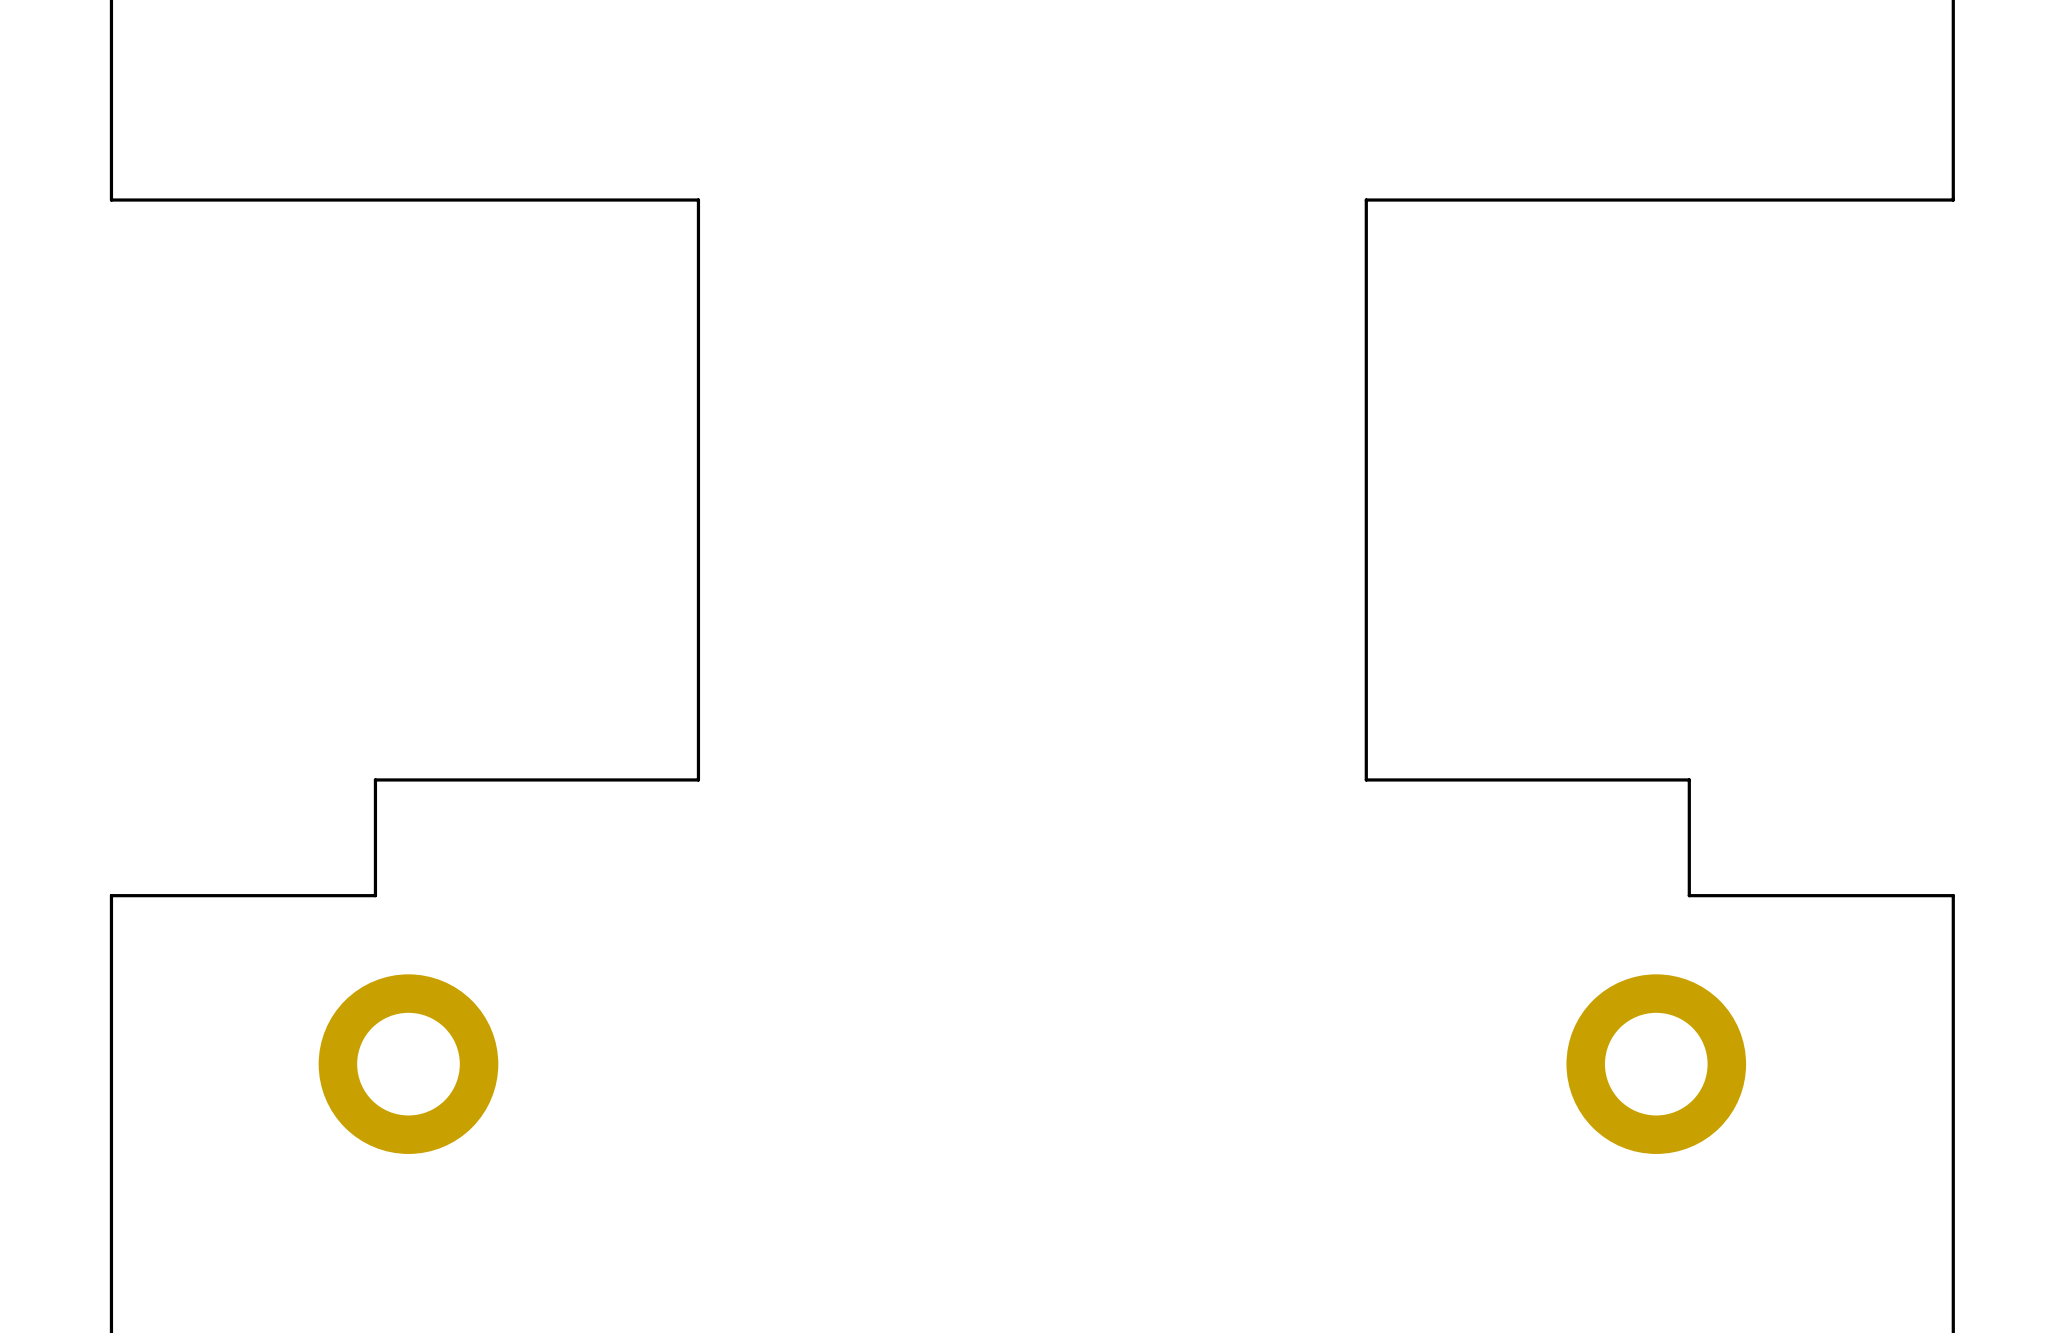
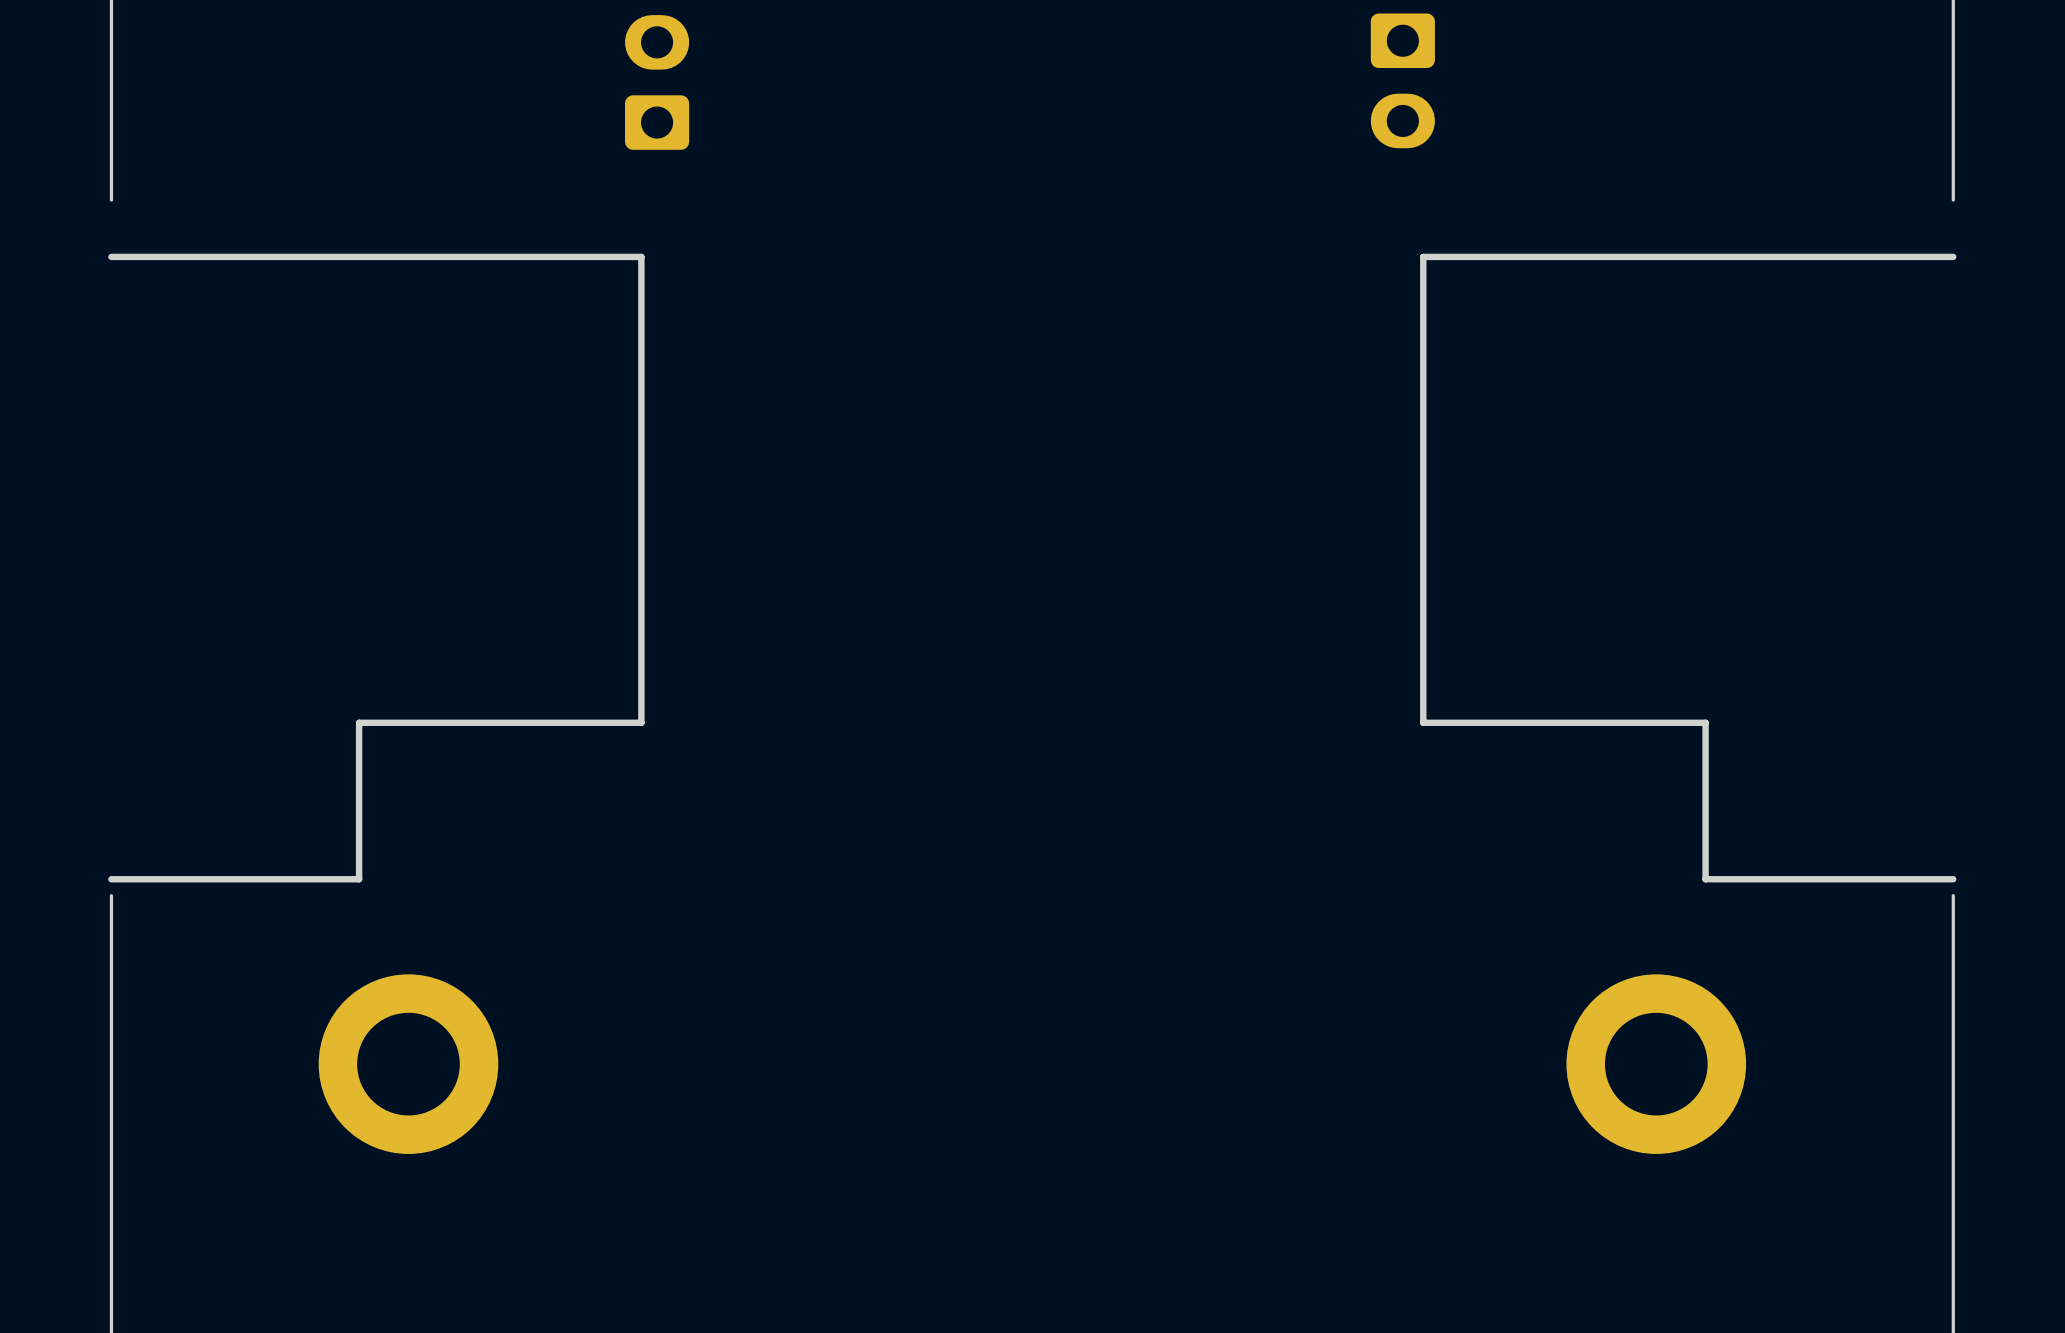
part: none -> (1402, 80)
part: none -> (657, 82)
board edge: (111, 200) (698, 200) (698, 779) (375, 779) (375, 895) (111, 895) -> none
board edge: (1953, 200) (1366, 200) (1366, 779) (1689, 779) (1689, 895) (1953, 895) -> none
board edge: none -> (111, 256) (641, 256) (641, 722) (359, 722) (359, 879) (111, 879)
board edge: none -> (1953, 256) (1423, 256) (1423, 722) (1705, 722) (1705, 879) (1953, 879)

